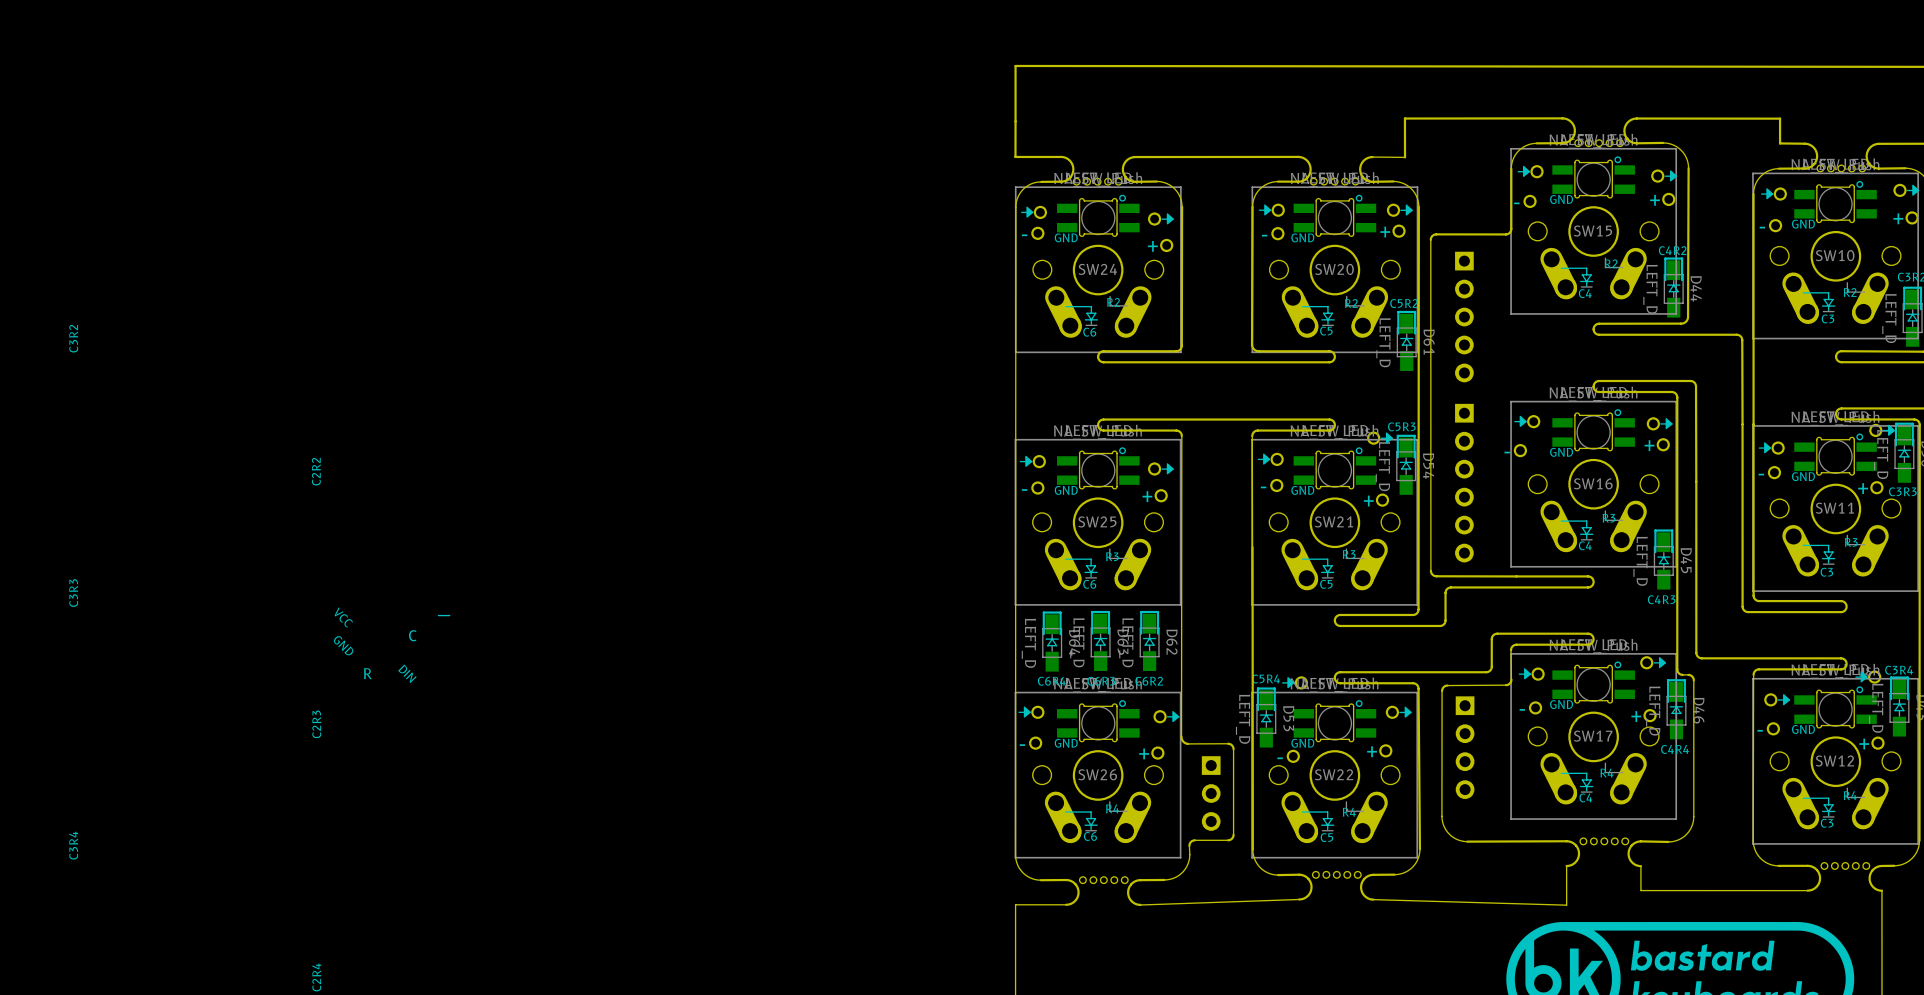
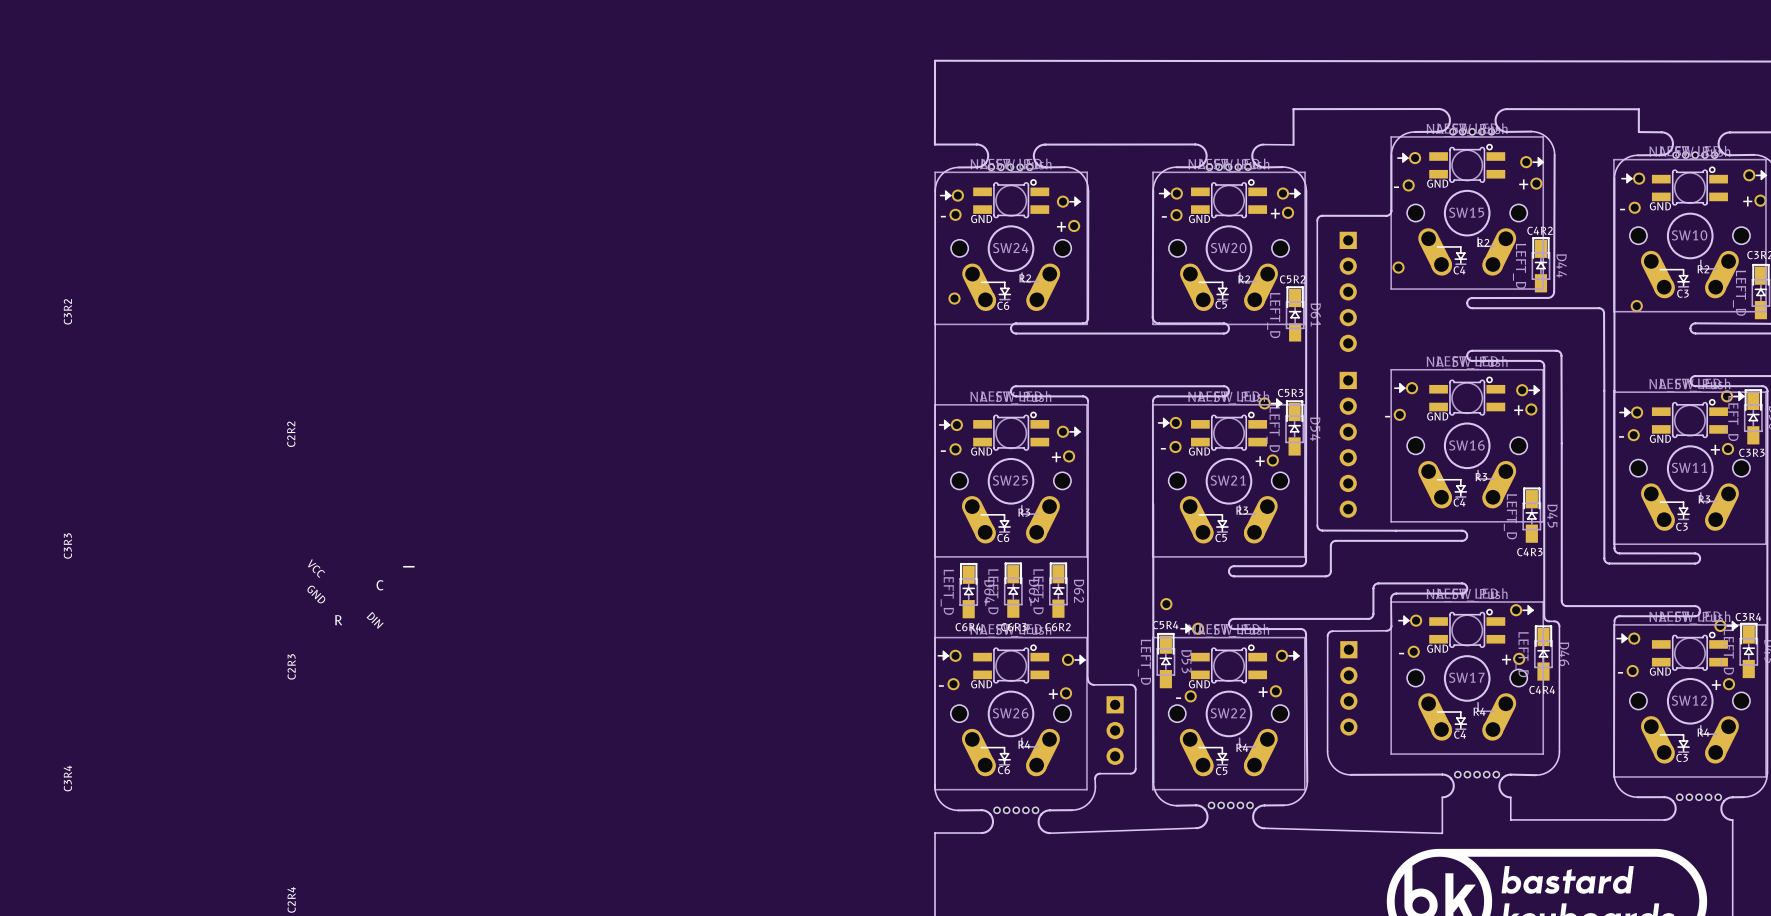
part: none -> (1398, 267)
part: none -> (954, 298)
part: none -> (1636, 306)
part: none -> (1166, 604)
part footprint: [1855, 670, 1882, 684] -> [1714, 619, 1739, 632]
part footprint: [1764, 693, 1791, 707] -> [1616, 632, 1641, 645]

